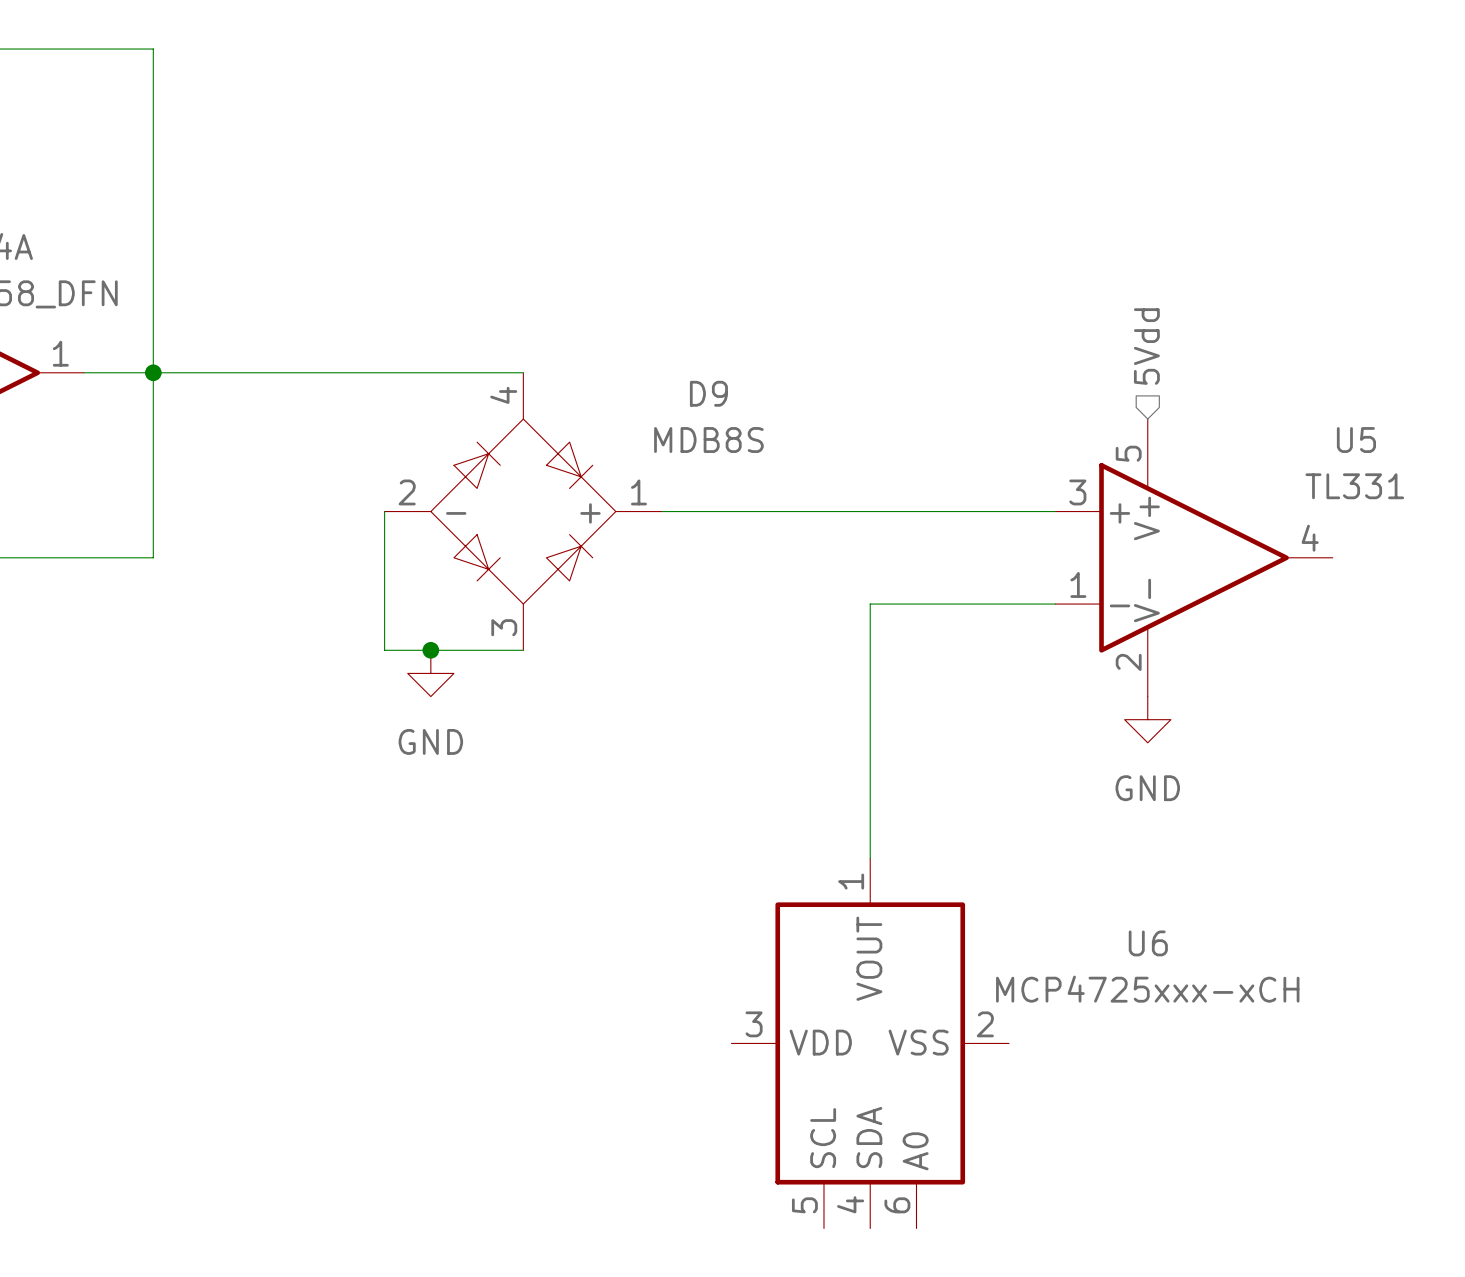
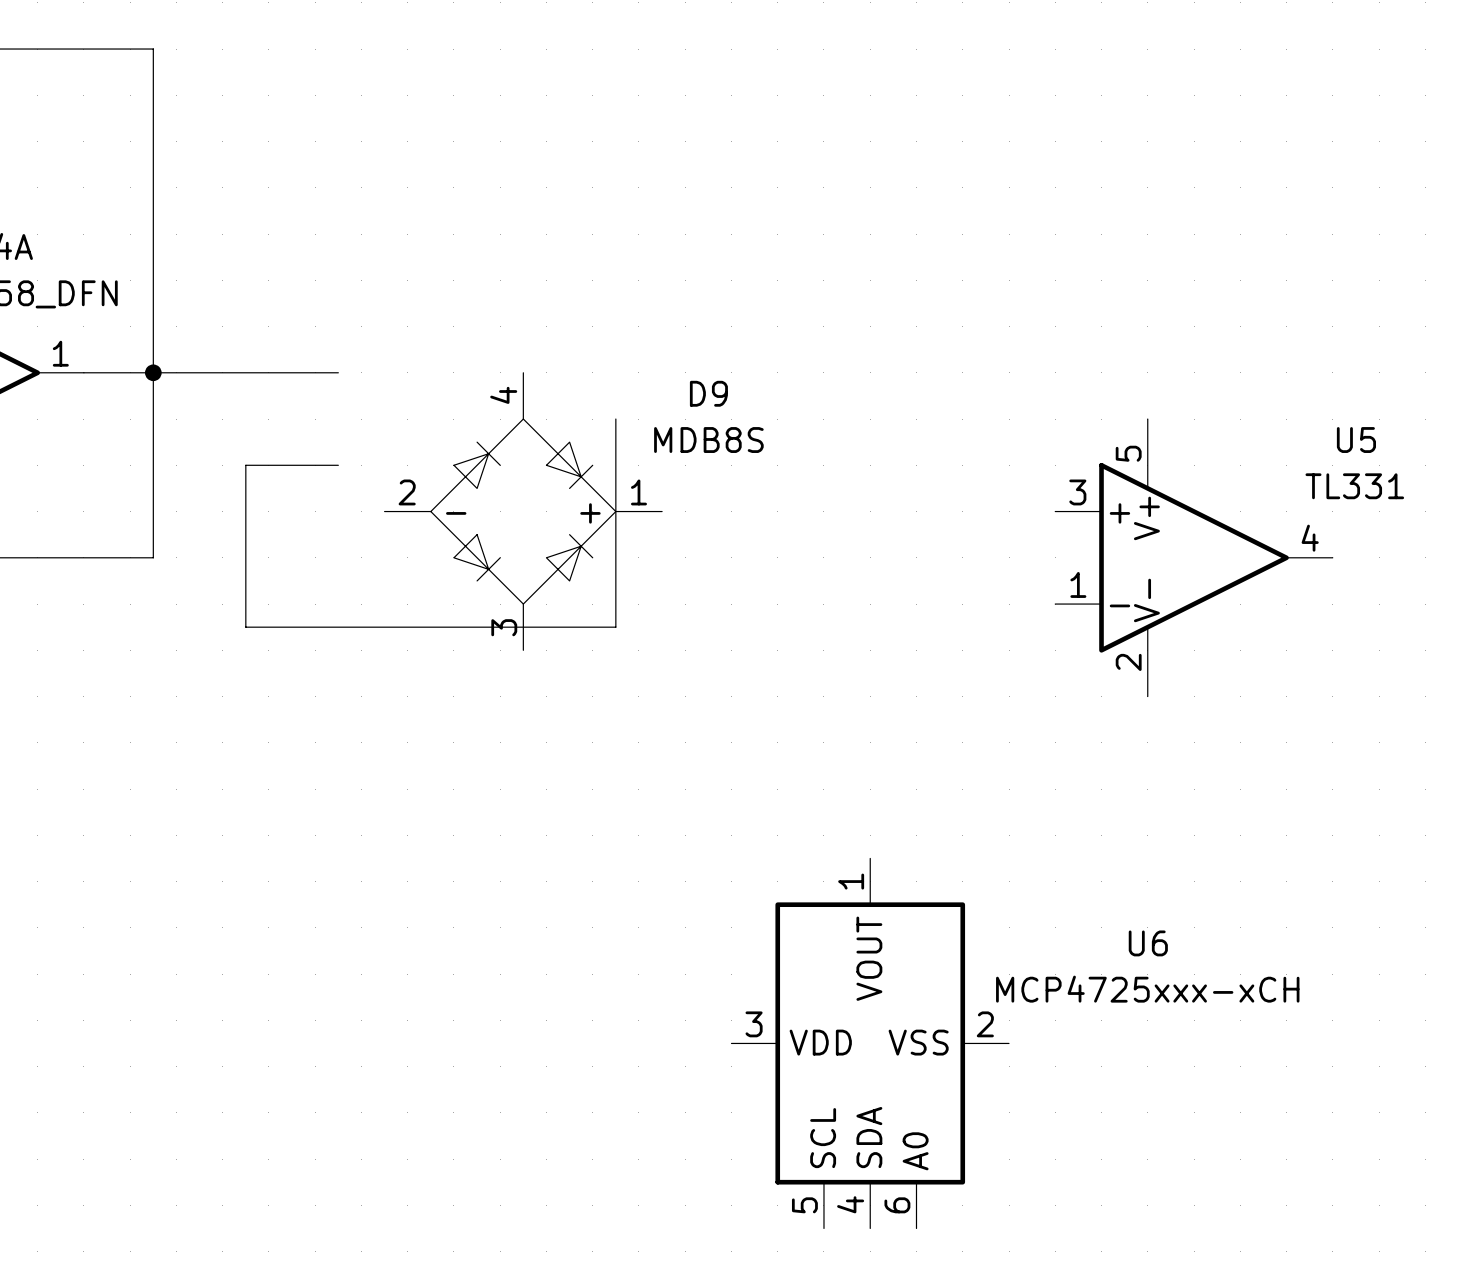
hierarchical label: 5Vdd (1146, 346) -> none
wire: (338, 372) (523, 372) -> none
wire: none -> (615, 419) (615, 627) (245, 627) (245, 465) (338, 465)
wire: (384, 511) (384, 650) (523, 650) -> none
wire: (662, 511) (1055, 511) -> none
wire: (1055, 604) (870, 604) (870, 858) -> none
junction: (430, 650) -> none
power symbol: GND (430, 673) -> none
power symbol: GND (1147, 719) -> none

